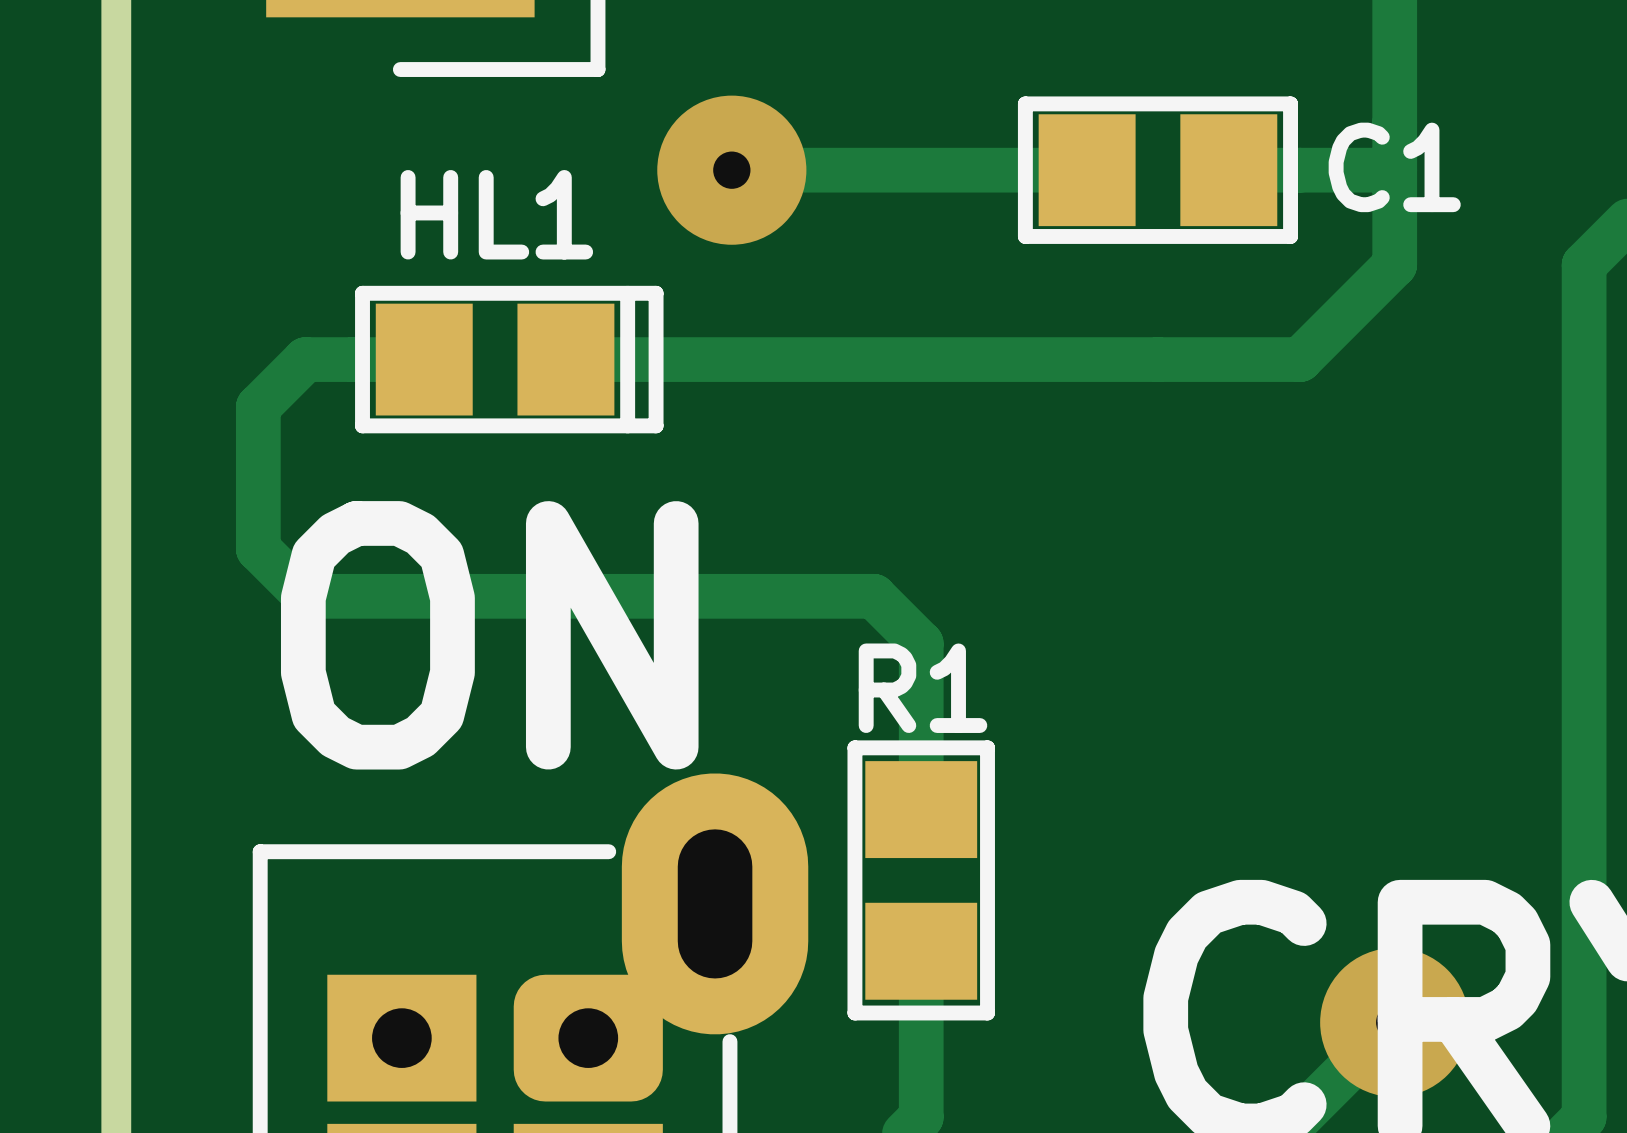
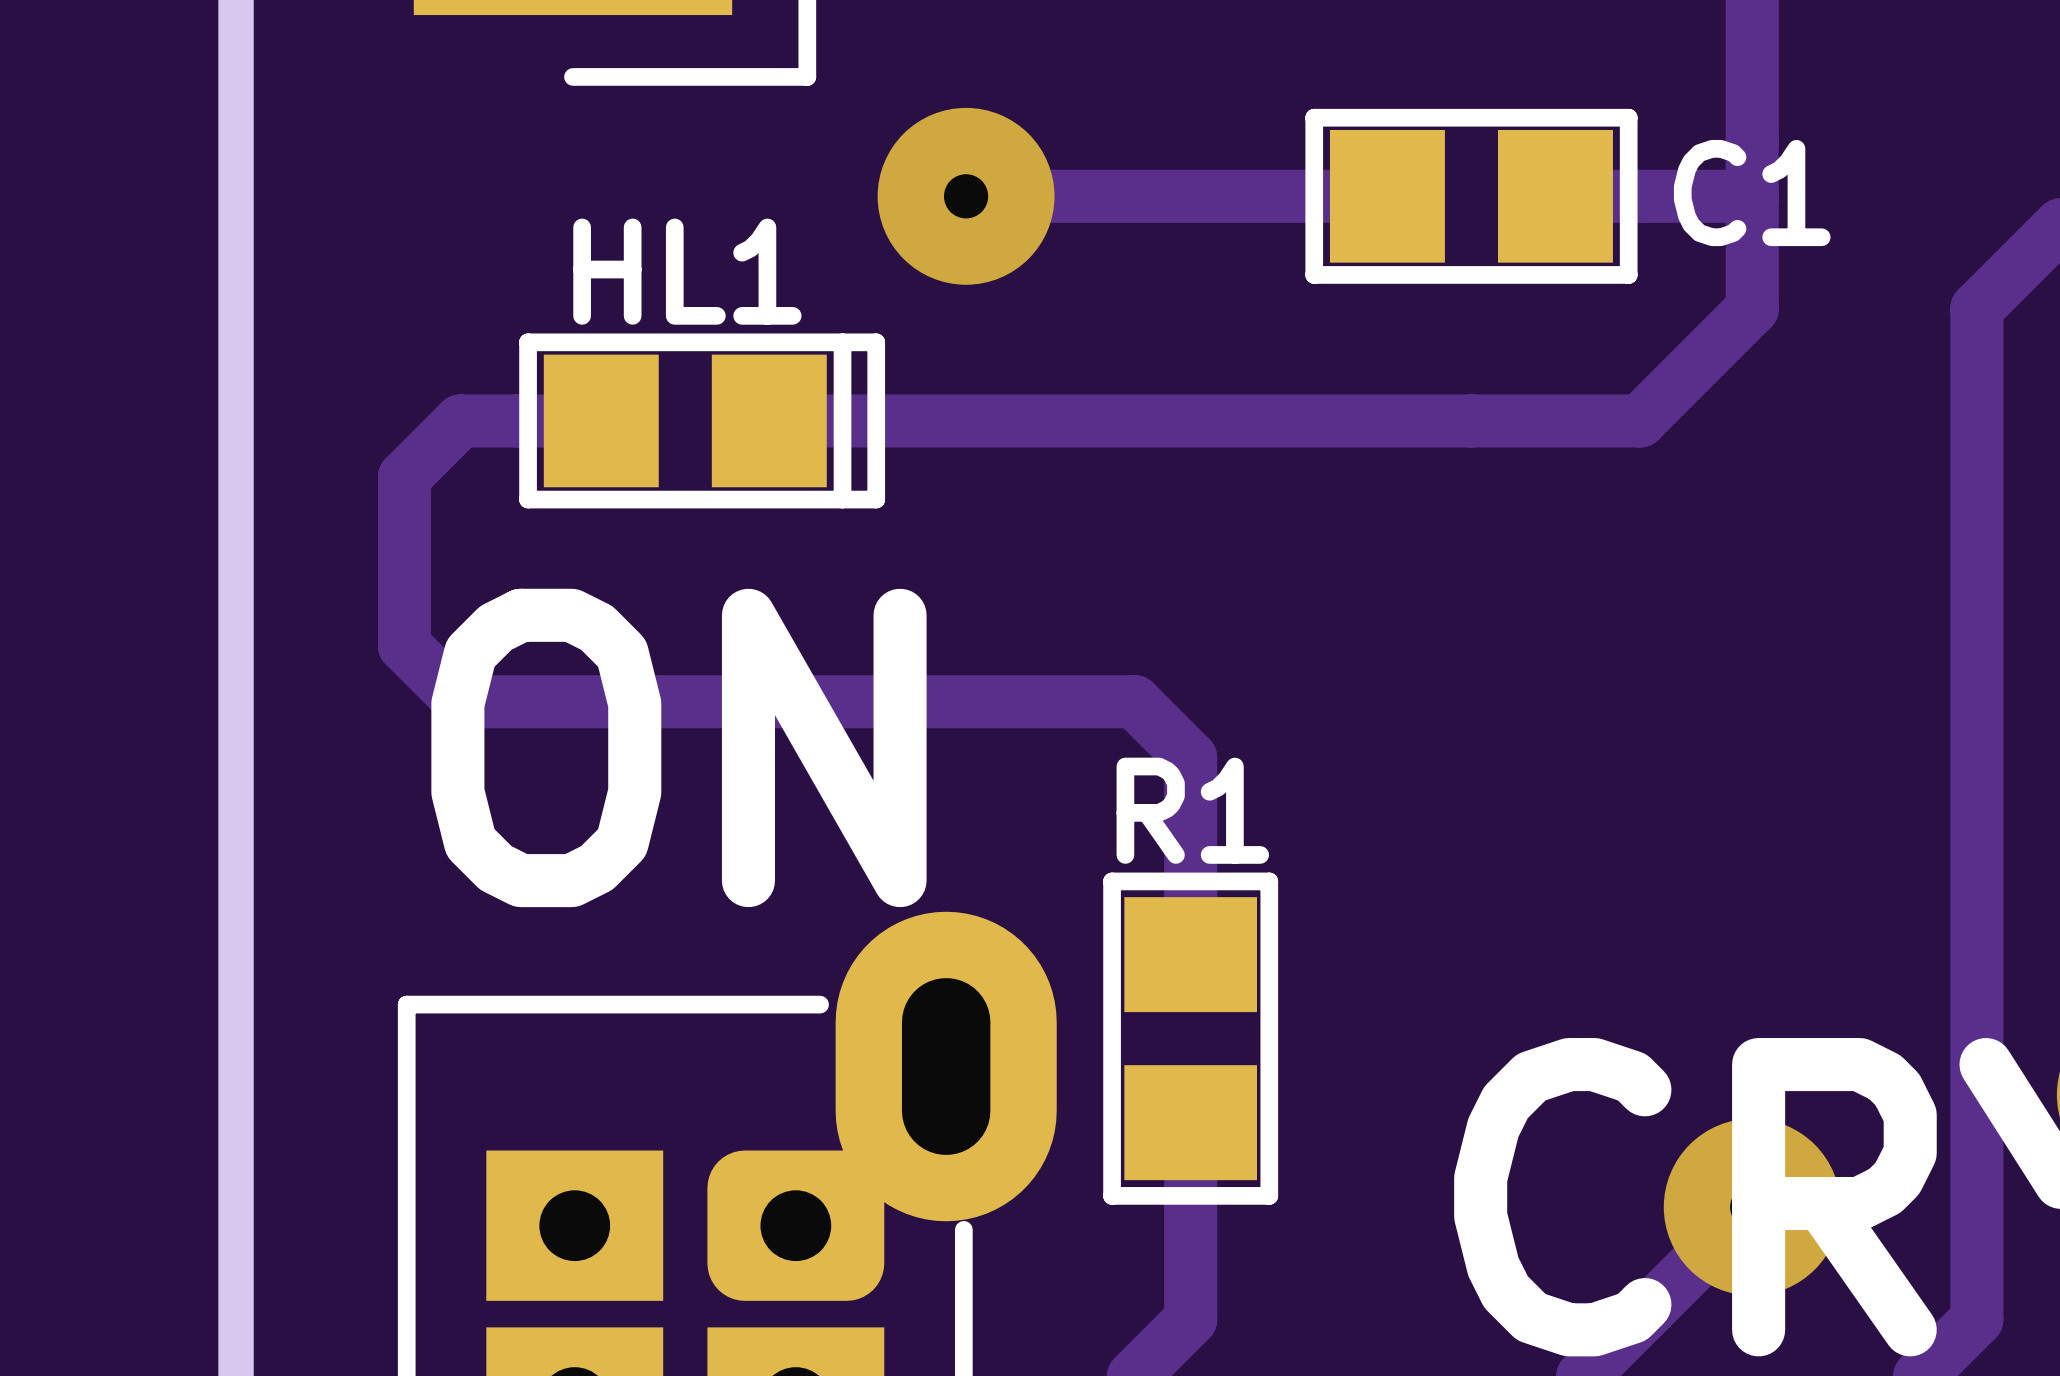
HL1 name position: HL1 (496, 214) -> HL1 (687, 271)

